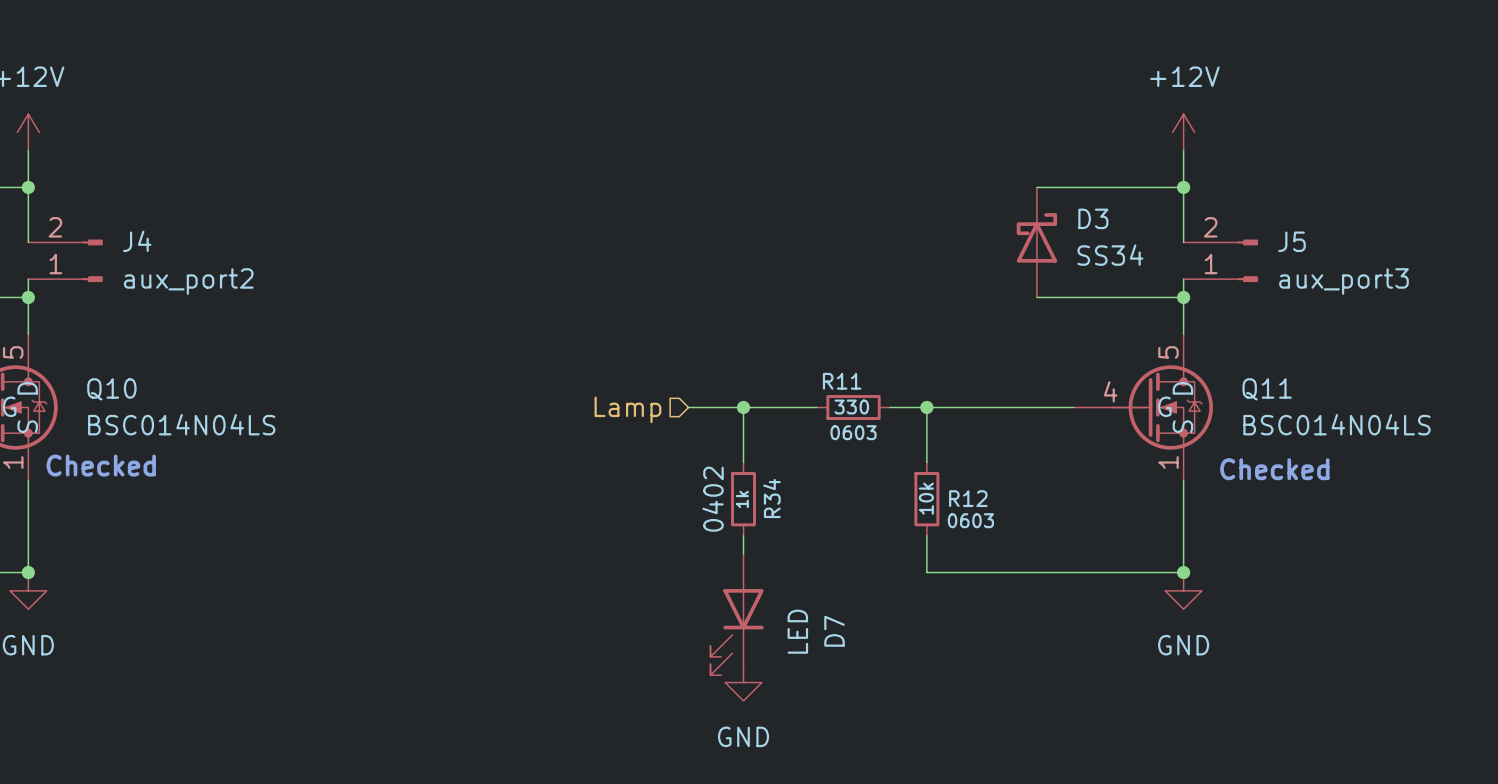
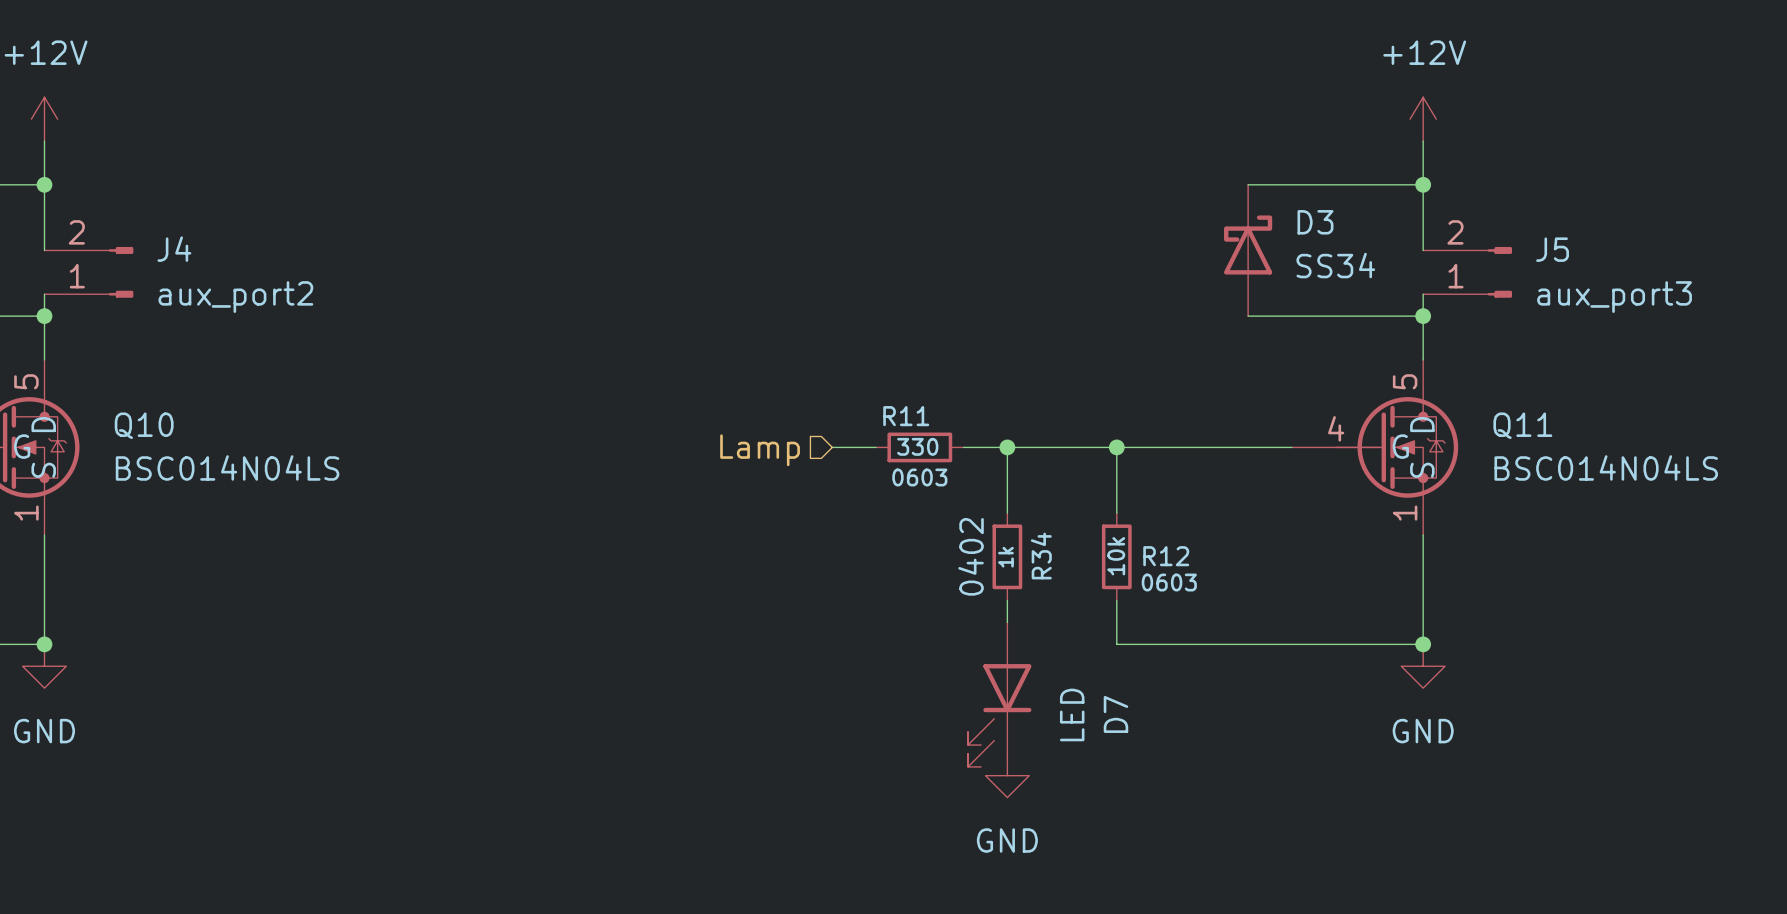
wire: (725, 407) (798, 407) -> (985, 447) (1073, 447)
wire: (743, 407) (743, 462) -> (1007, 447) (1007, 513)
junction: (743, 407) -> none
junction: none -> (1007, 447)
R11 position: (853, 407) -> (919, 447)
text: Checked (101, 465) -> none
text: Checked (1274, 469) -> none
R34 position: (743, 499) -> (1007, 556)
wire: (743, 535) (743, 554) -> (1007, 600) (1007, 622)
D7 position: (737, 614) -> (999, 694)
power symbol position: GND (743, 682) -> GND (1007, 775)

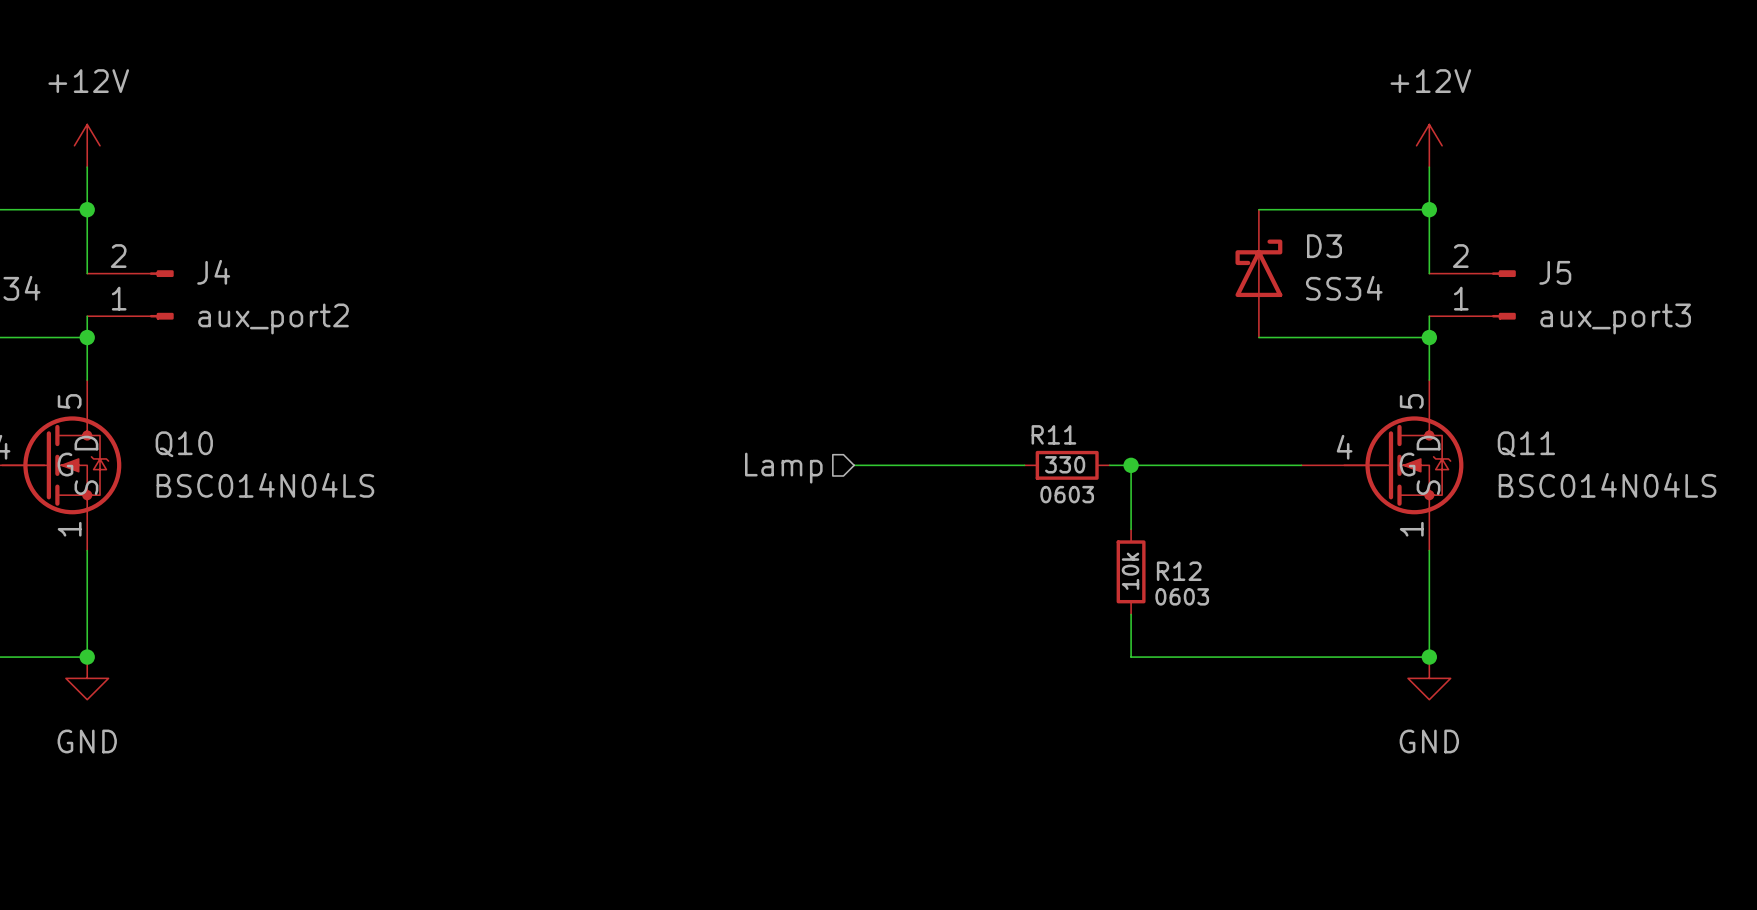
wire: none -> (896, 465) (981, 465)
R11 position: (919, 447) -> (1067, 465)
junction: (1007, 447) -> none
wire: (1094, 447) (1007, 447) (1007, 513) -> none
R34: 1k (1007, 556) -> none
wire: (1007, 600) (1007, 622) -> none
D7: LED (999, 694) -> none
power symbol: GND (1007, 775) -> none

